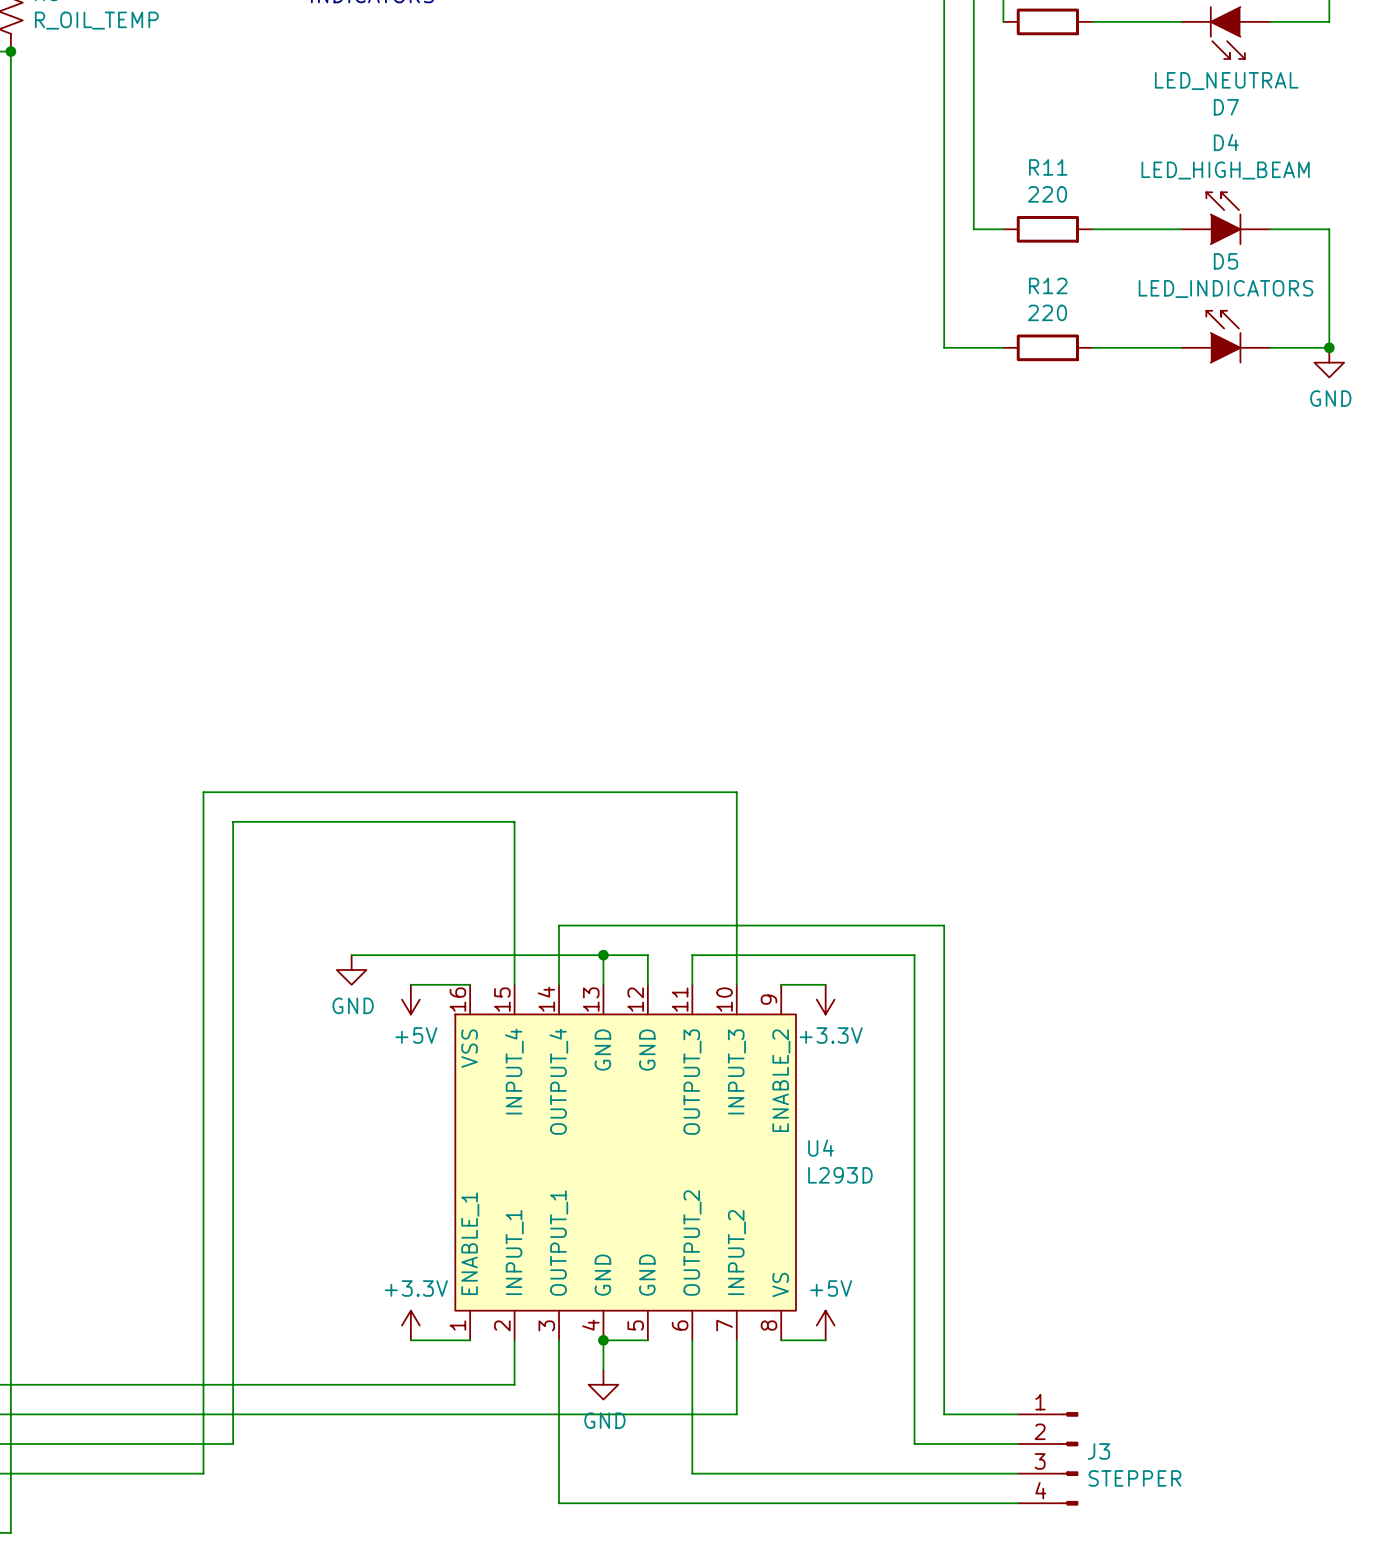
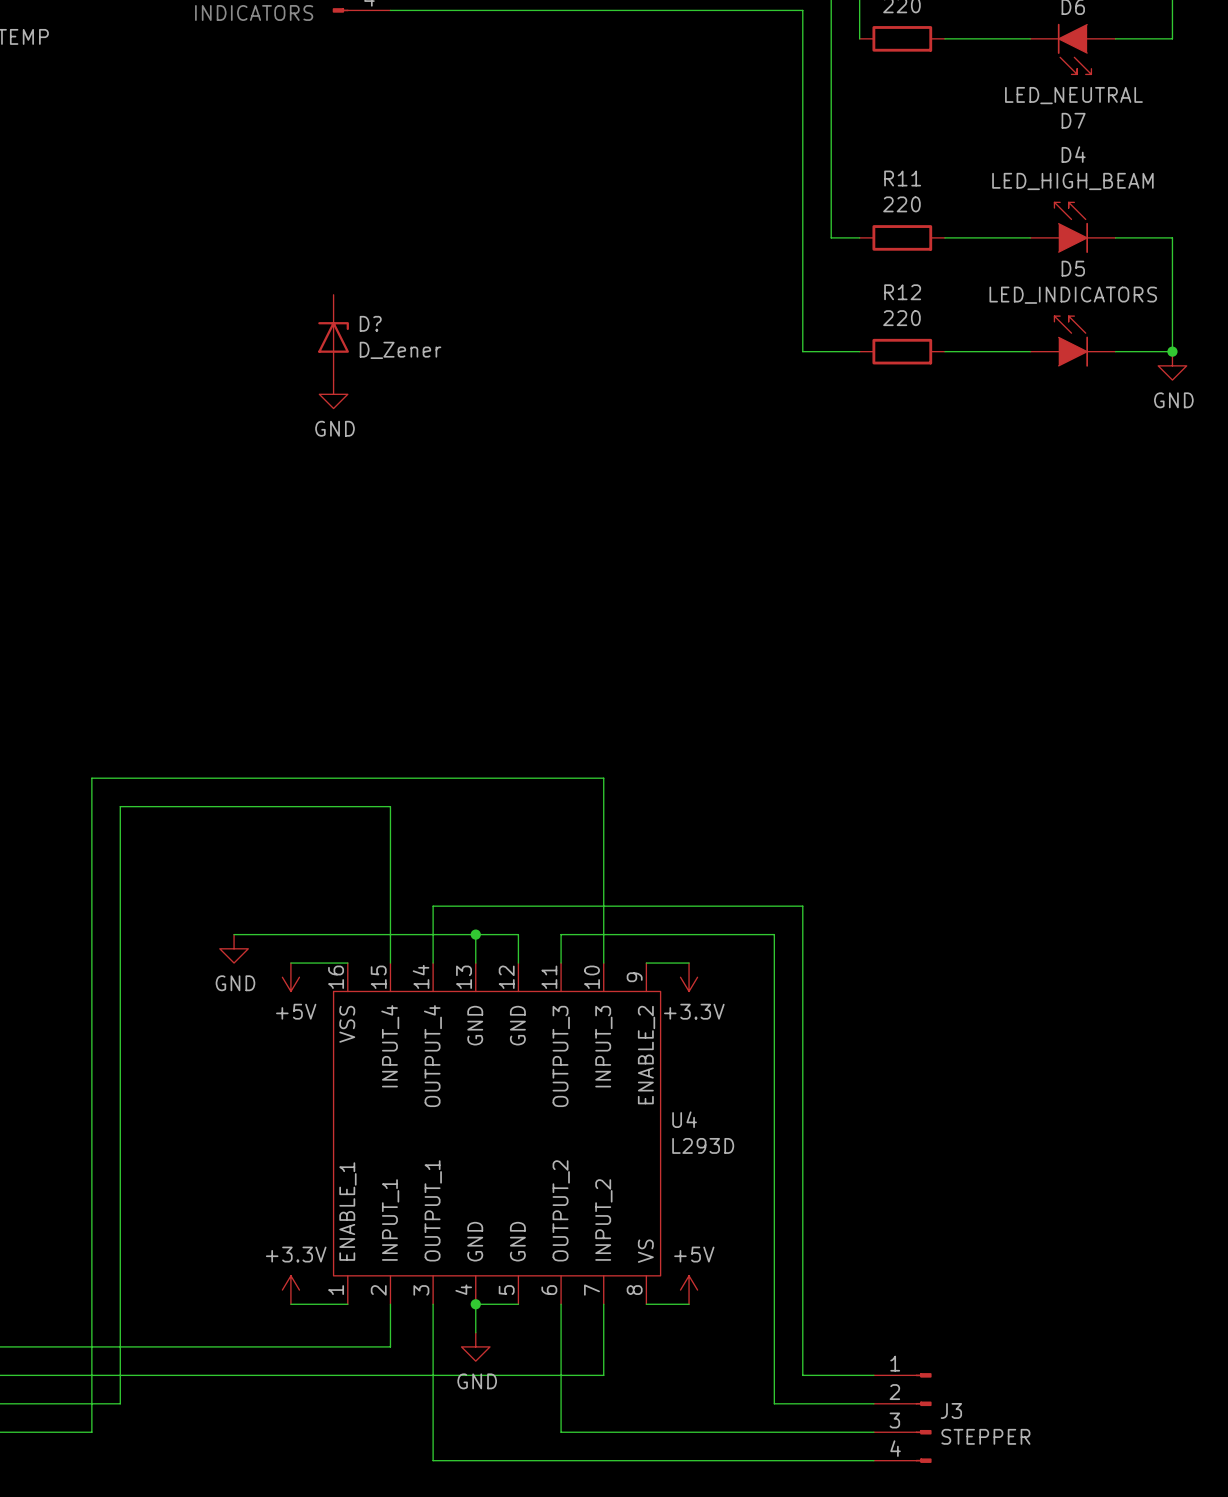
D?: none -> D_Zener (333, 337)
power symbol: none -> GND (333, 394)

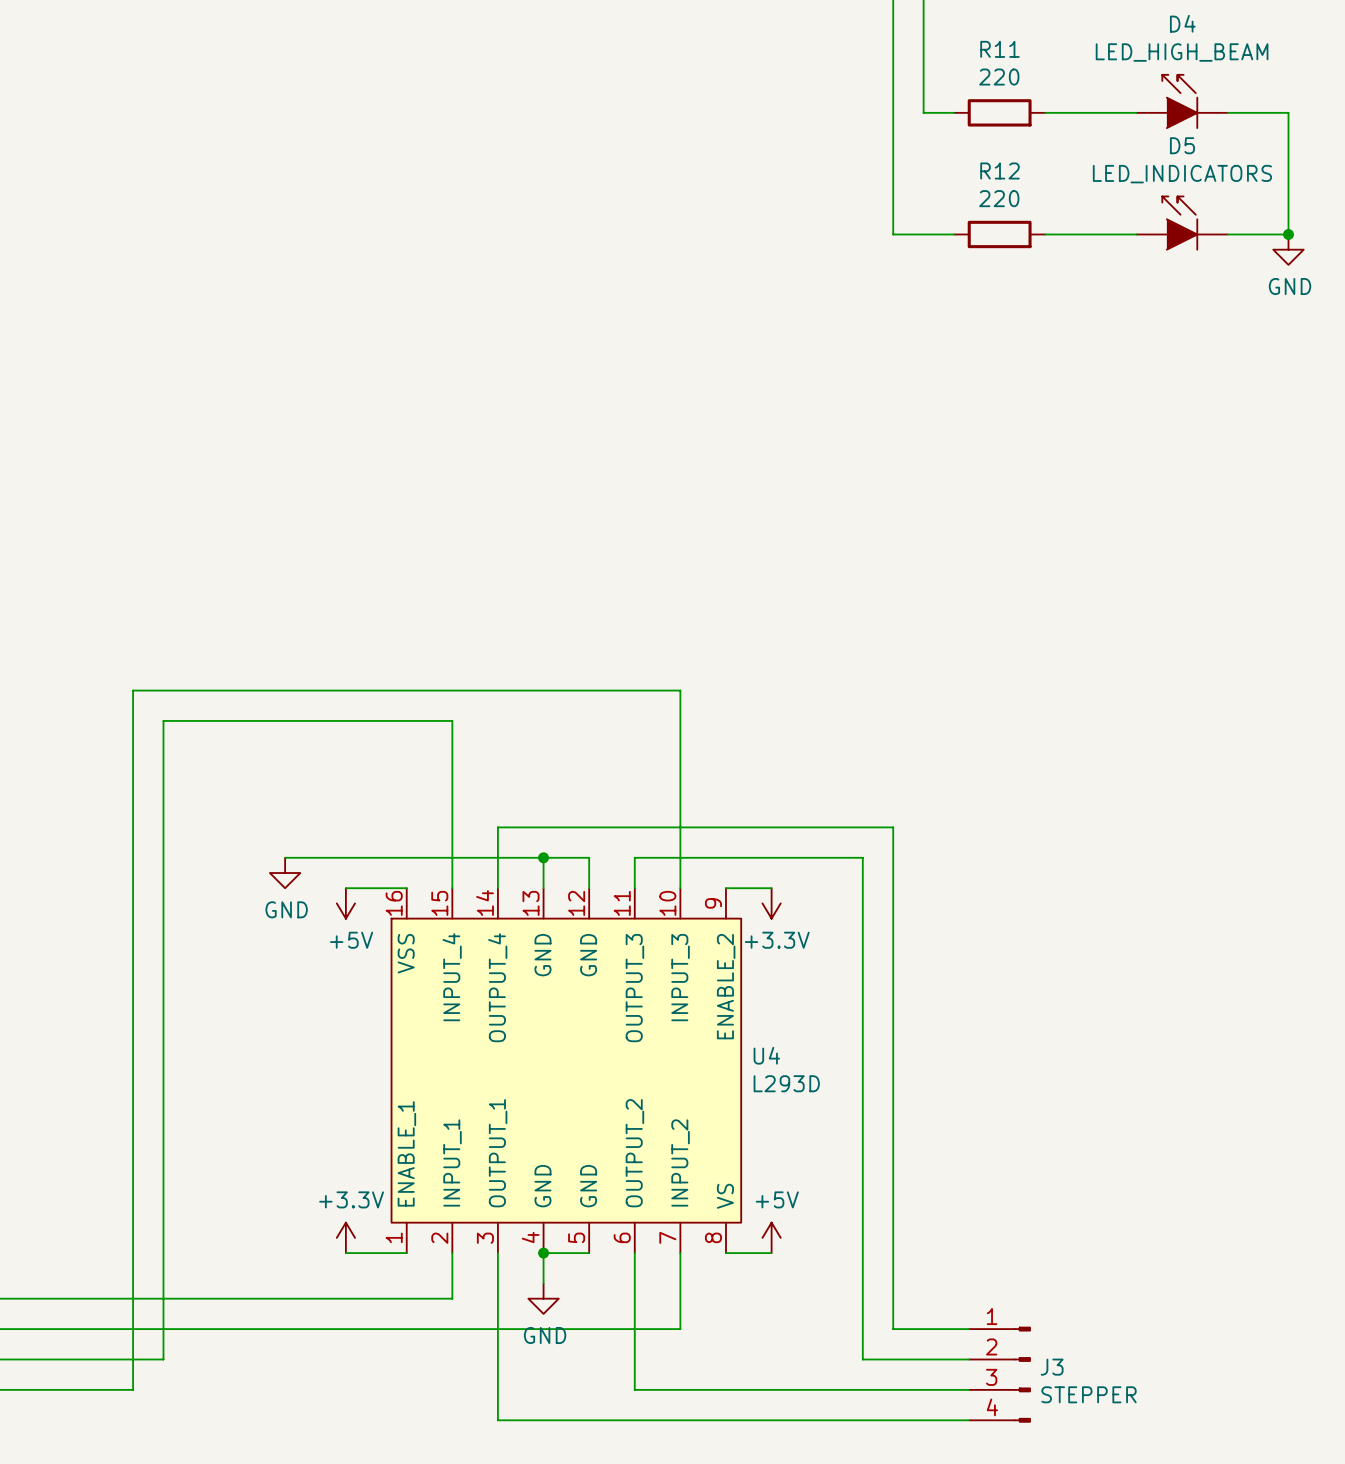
D?: D_Zener (333, 337) -> none
power symbol: GND (333, 394) -> none

